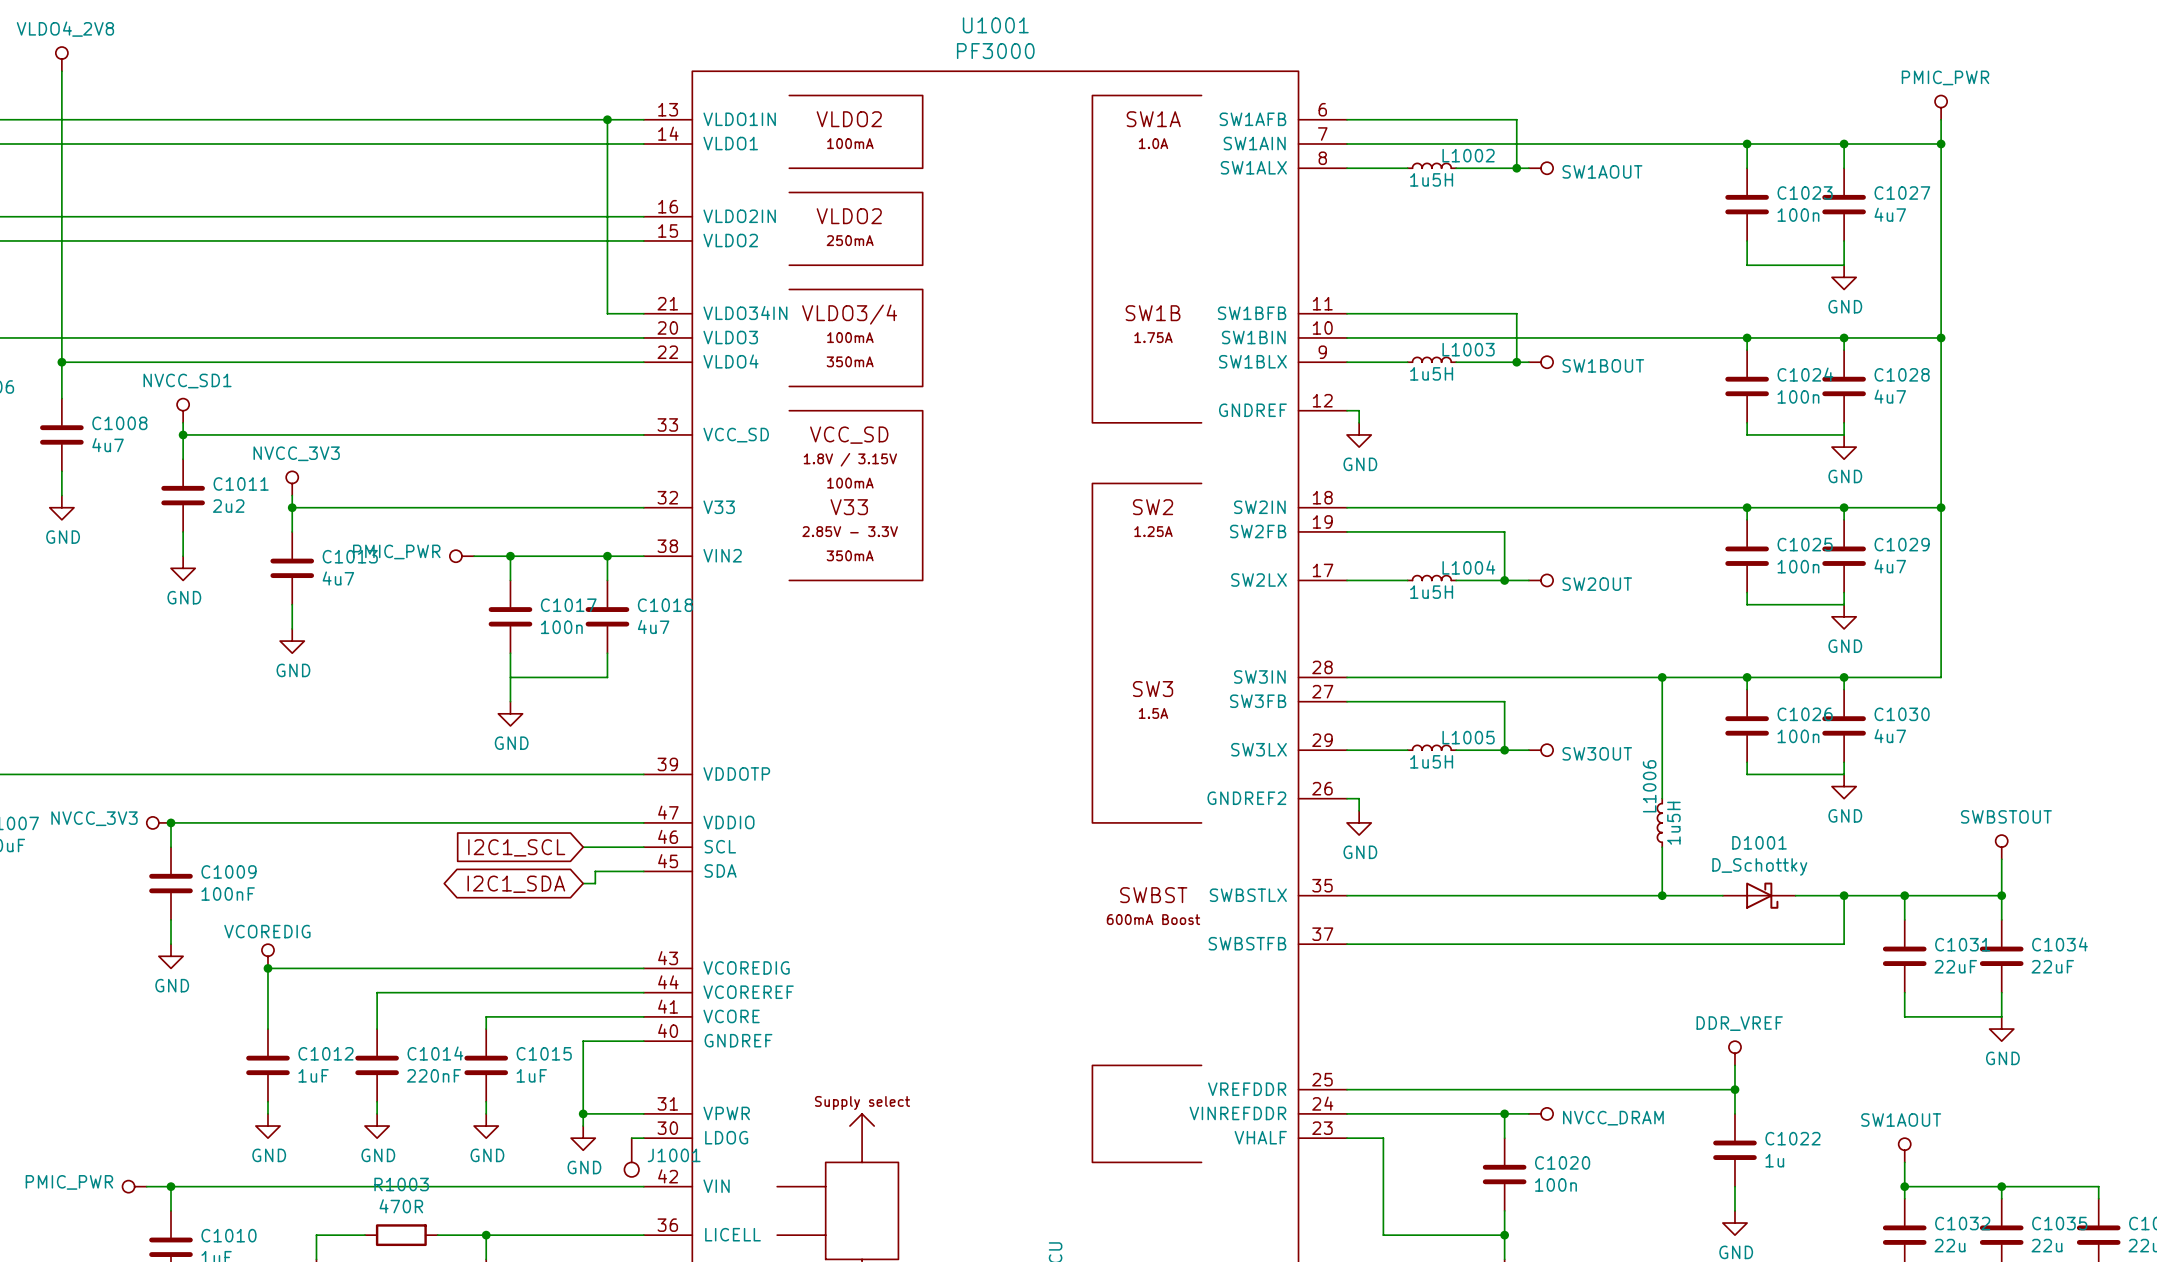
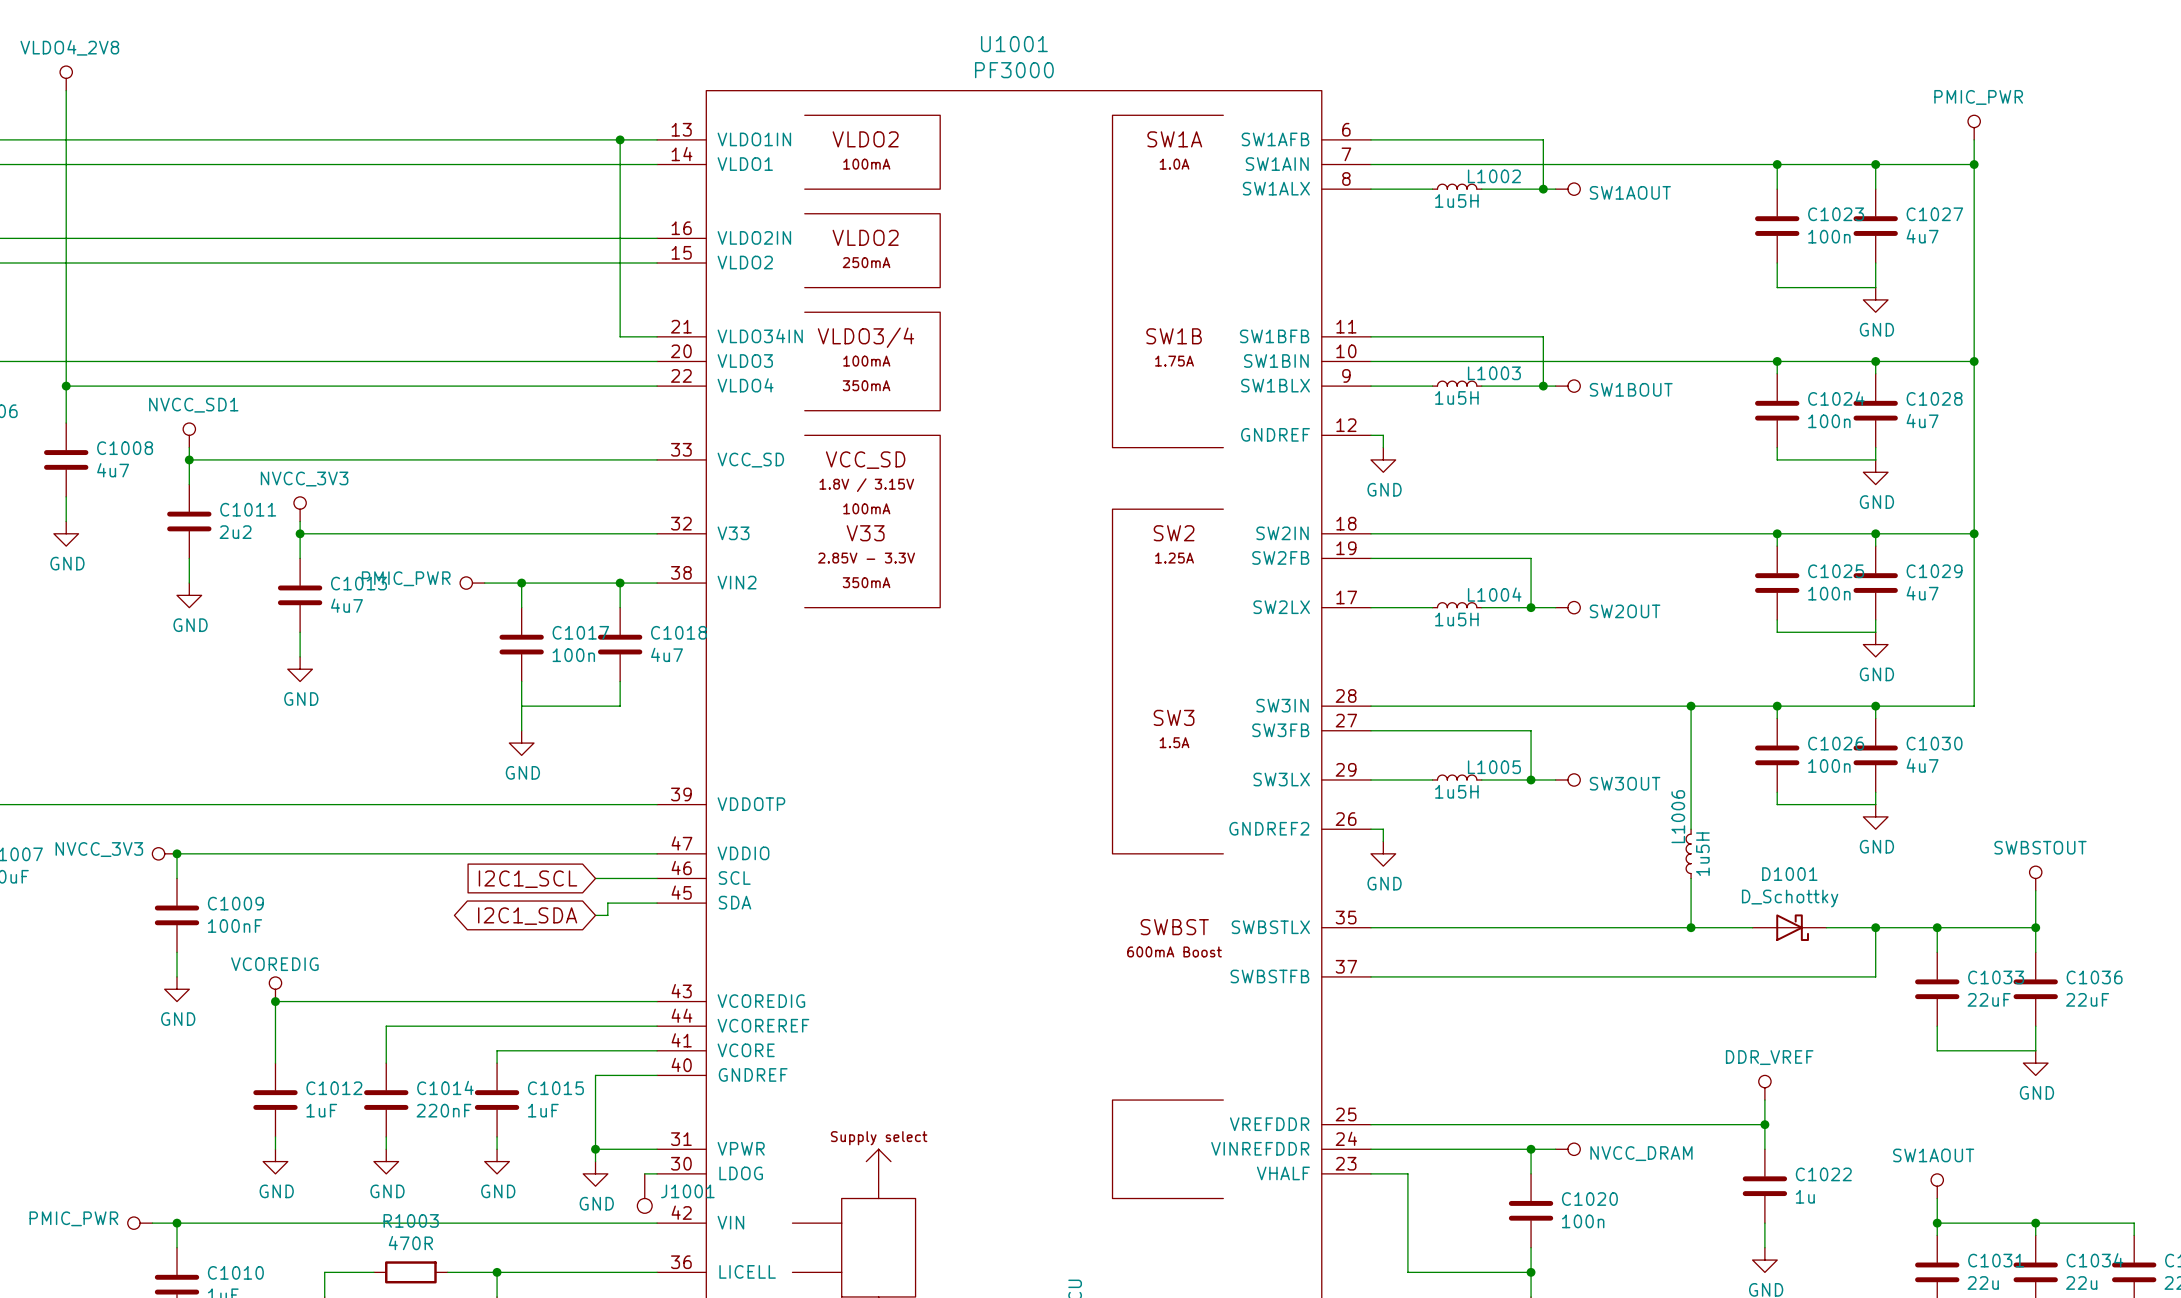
C1031 name: C1031 (1962, 944) -> C1033 (1996, 977)
C1034 name: C1034 (2059, 944) -> C1036 (2094, 977)
C1032 name: C1032 (1962, 1223) -> C1031 (1996, 1260)
C1035 name: C1035 (2059, 1223) -> C1034 (2094, 1260)

